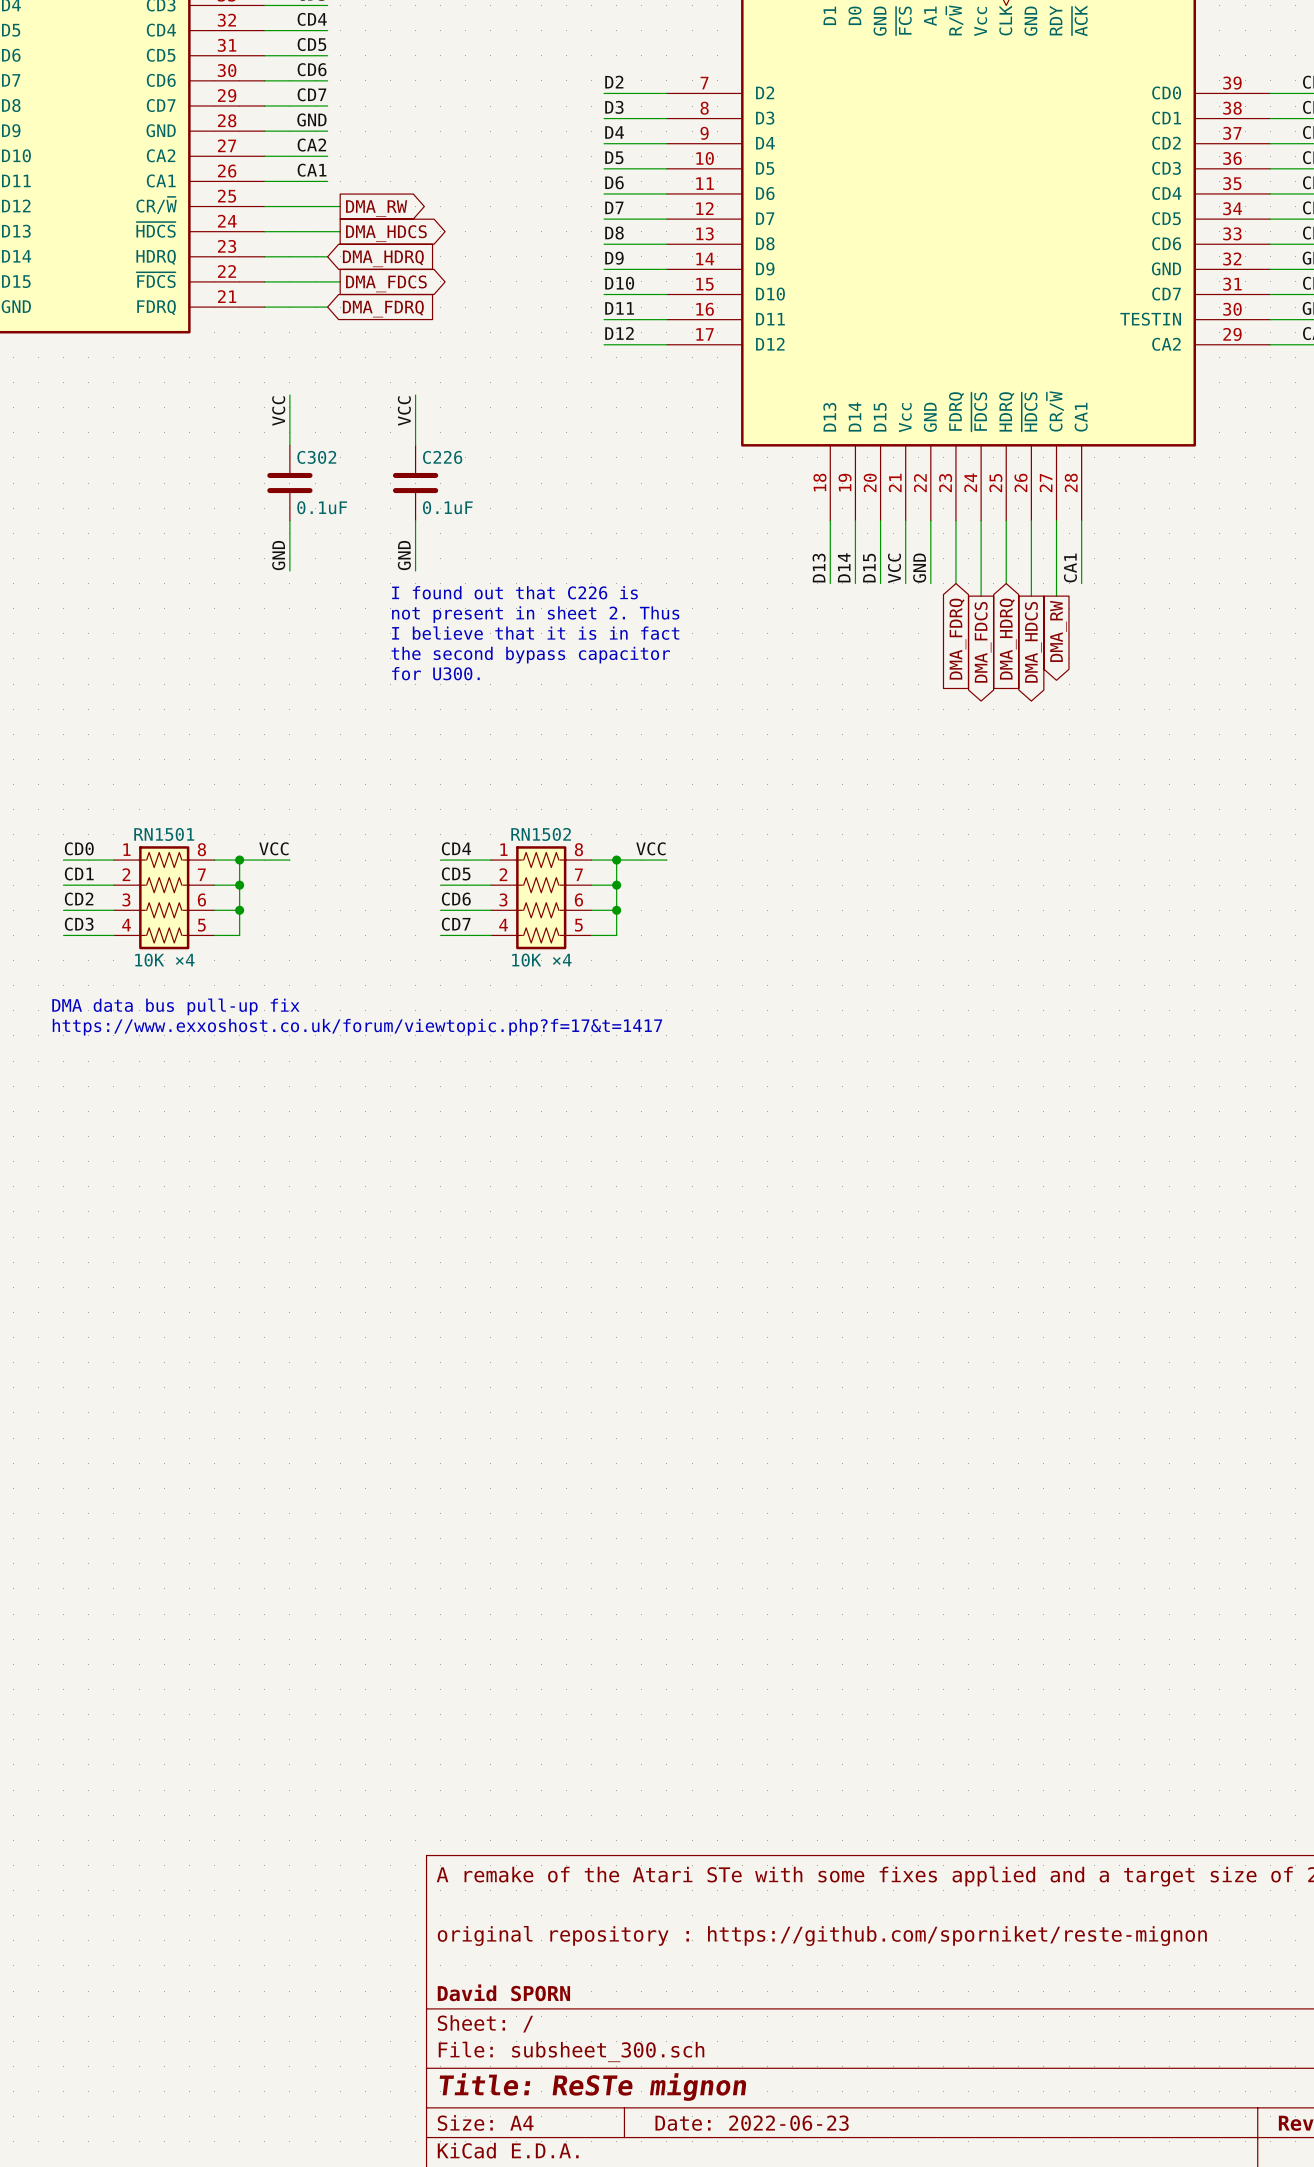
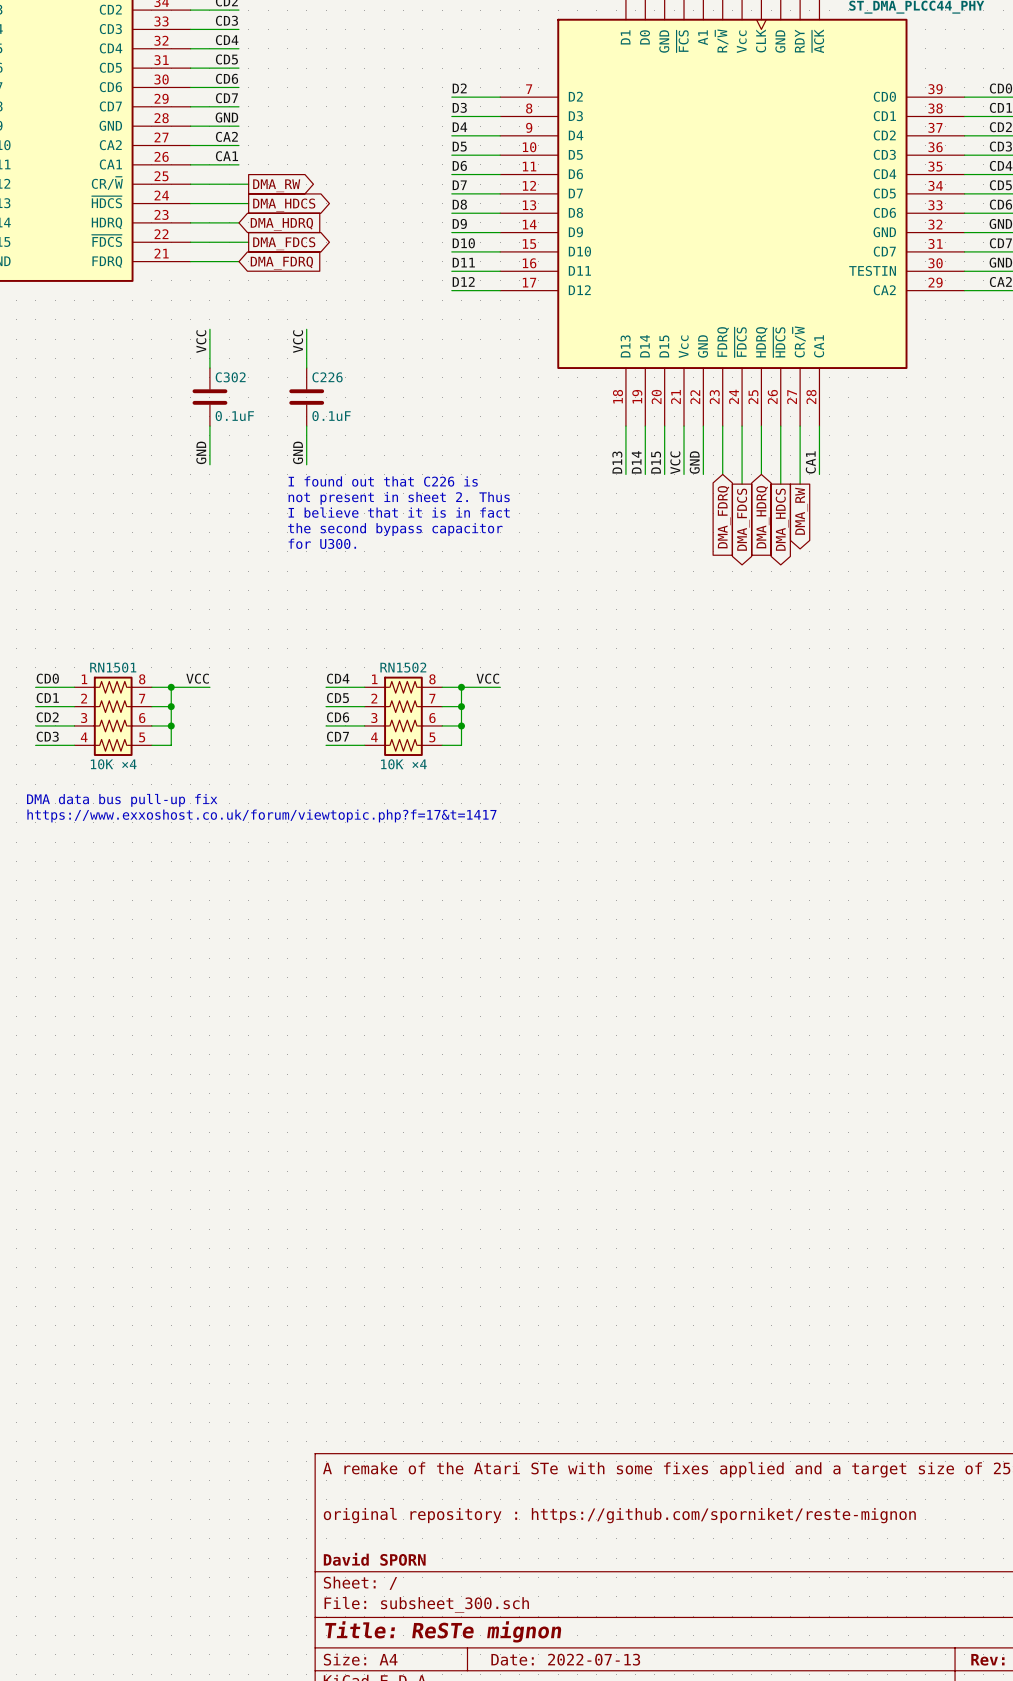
title block: Date: 2022-06-23 (752, 2123) -> Date: 2022-07-13 (565, 1659)

